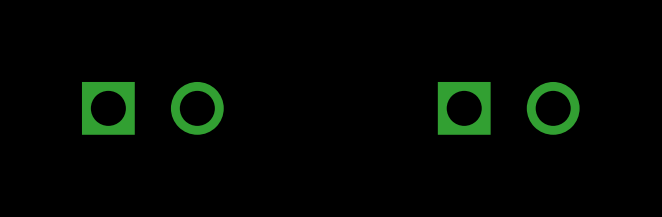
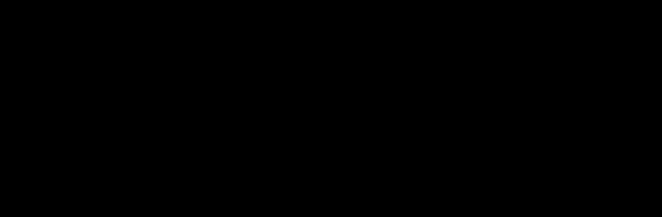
part: (152, 108) -> none
part: (508, 108) -> none

